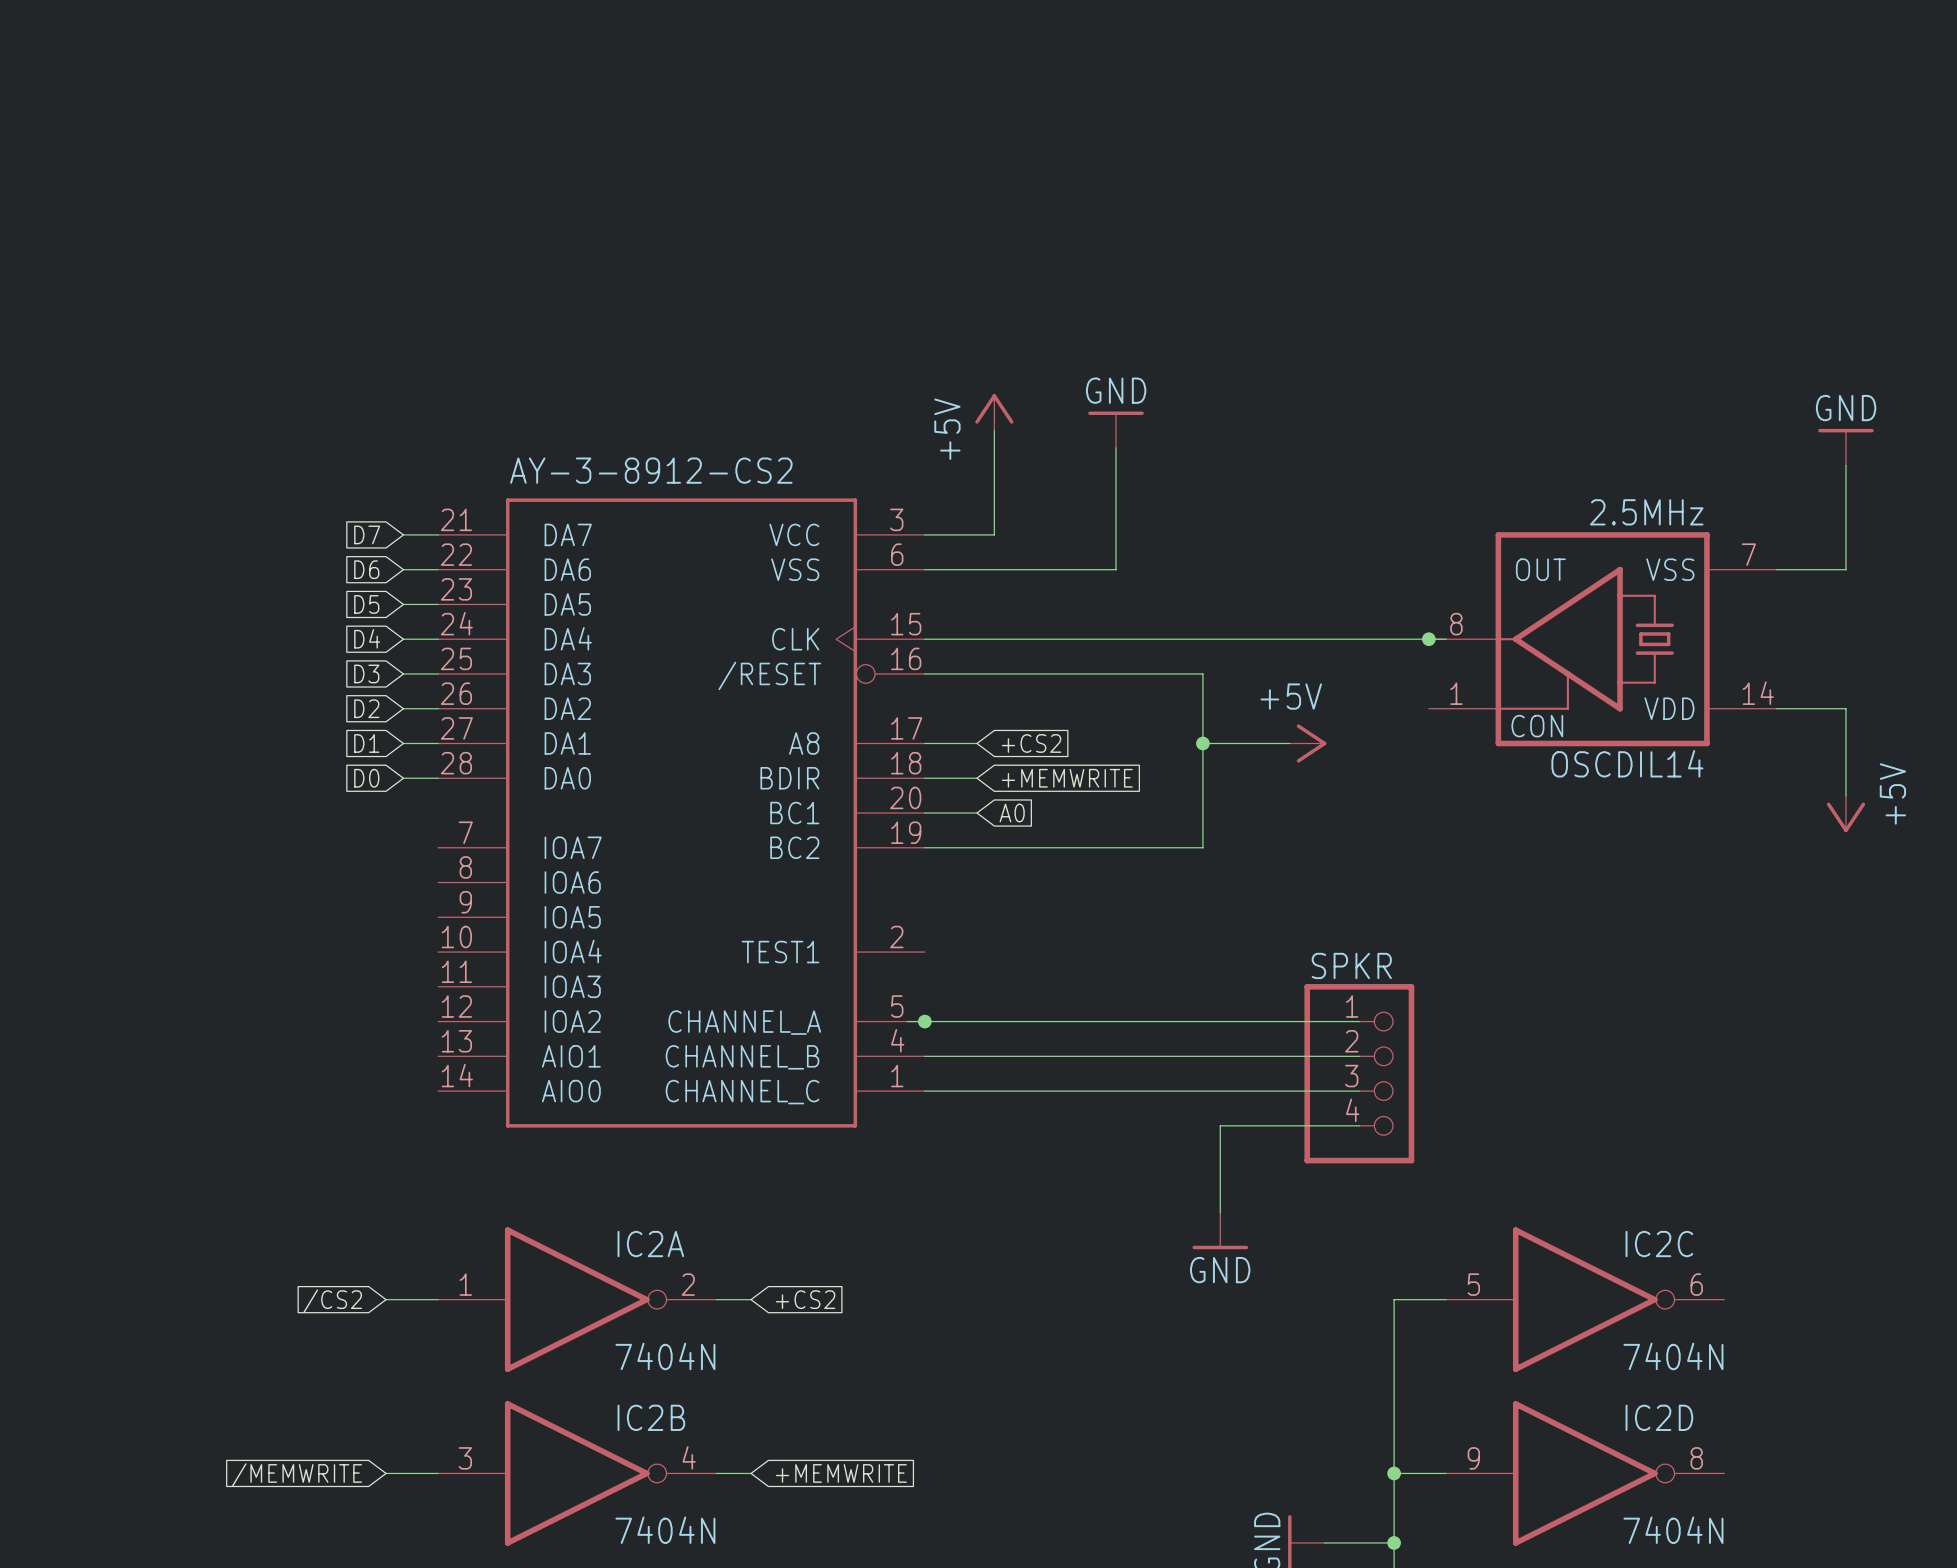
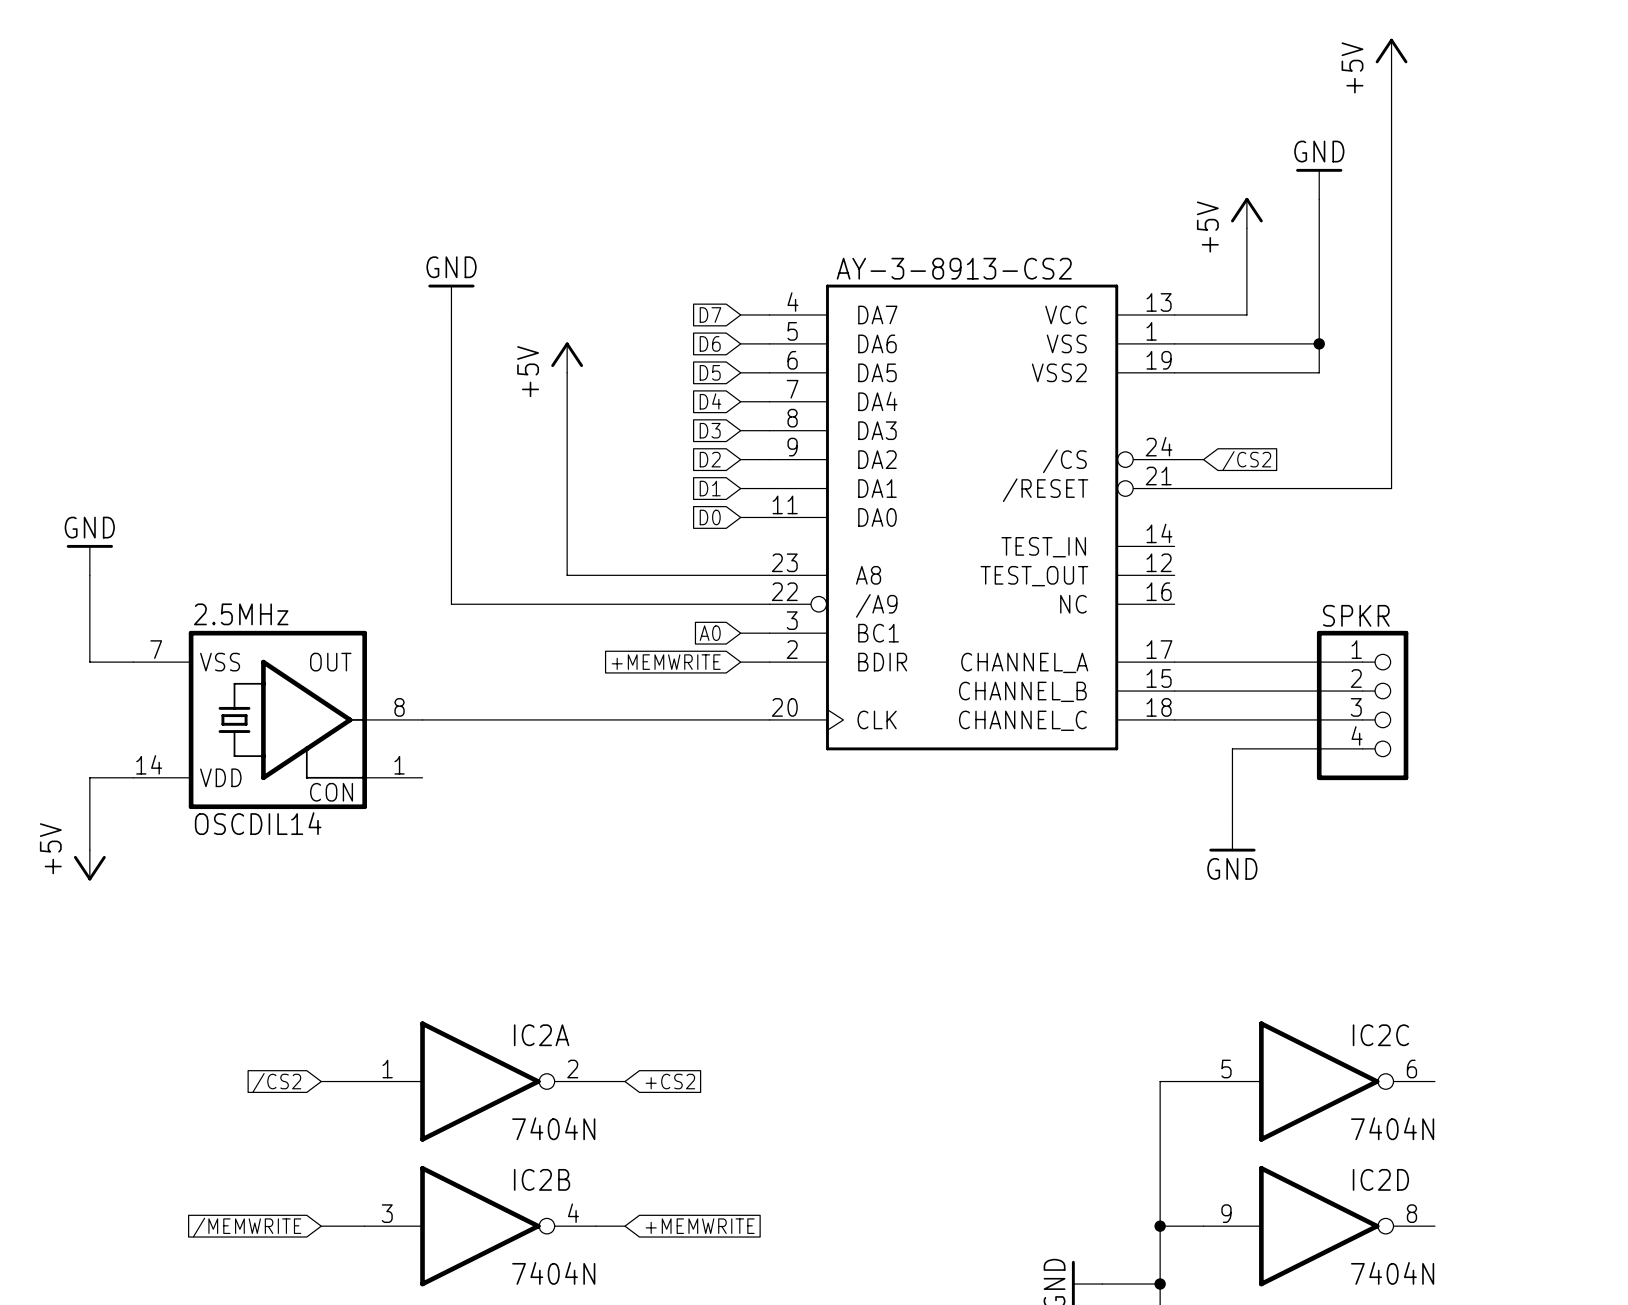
power symbol: none -> +5V (1391, 53)
wire: none -> (1391, 69) (1391, 488) (1174, 488)
power symbol: none -> GND (1319, 184)
wire: none -> (1319, 199) (1319, 372) (1174, 372)
power symbol: none -> +5V (1246, 213)
wire: none -> (1246, 228) (1246, 314) (1174, 314)
power symbol: none -> GND (451, 299)
wire: none -> (451, 314) (451, 604) (769, 604)
global label: none -> D7 (710, 314)
wire: none -> (740, 314) (769, 314)
power symbol: +5V (994, 412) -> none
global label: none -> D6 (710, 343)
wire: none -> (740, 343) (769, 343)
wire: none -> (1174, 343) (1319, 343)
junction: none -> (1319, 343)
power symbol: none -> +5V (567, 357)
power symbol: GND (1116, 429) -> none
wire: (994, 430) (994, 534) (924, 534) -> none
power symbol: GND (1845, 447) -> none
wire: none -> (567, 372) (567, 575) (769, 575)
global label: none -> D5 (710, 372)
wire: none -> (740, 372) (769, 372)
wire: (1116, 448) (1116, 569) (924, 569) -> none
wire: (1845, 465) (1845, 569) (1776, 569) -> none
global label: none -> D4 (710, 401)
wire: none -> (740, 401) (769, 401)
global label: none -> D3 (710, 430)
wire: none -> (740, 430) (769, 430)
global label: D7 (367, 534) -> none
wire: (403, 534) (438, 534) -> none
global label: none -> D2 (710, 459)
wire: none -> (740, 459) (769, 459)
wire: none -> (1174, 459) (1203, 459)
global label: none -> /CS2 (1246, 460)
global label: D6 (366, 569) -> none
wire: (403, 569) (438, 569) -> none
global label: none -> D1 (710, 488)
wire: none -> (740, 488) (769, 488)
global label: D5 (366, 604) -> none
wire: (403, 604) (438, 604) -> none
global label: none -> D0 (710, 517)
wire: none -> (740, 517) (769, 517)
AY-3-8913-CS2: none -> (972, 517)
global label: D4 (367, 638) -> none
wire: (403, 639) (438, 639) -> none
wire: (924, 639) (1446, 639) -> none
junction: (1428, 639) -> none
OSCDIL14 flip: as is (1602, 639) -> left-right (277, 719)
OSCDIL14 position: (1602, 639) -> (277, 719)
power symbol: none -> GND (89, 560)
global label: D3 (366, 673) -> none
wire: (403, 673) (438, 673) -> none
wire: (924, 673) (1202, 673) (1202, 847) (924, 847) -> none
wire: none -> (89, 575) (89, 662) (133, 662)
global label: D2 (366, 708) -> none
wire: (403, 708) (438, 708) -> none
wire: (1776, 708) (1845, 708) (1845, 795) -> none
global label: D1 (366, 743) -> none
wire: (403, 743) (438, 743) -> none
wire: (924, 743) (976, 743) -> none
global label: +CS2 (1031, 743) -> none
wire: (1202, 743) (1289, 743) -> none
junction: (1202, 743) -> none
power symbol: +5V (1308, 743) -> none
wire: none -> (740, 633) (769, 633)
global label: D0 (366, 778) -> none
wire: (403, 778) (438, 778) -> none
wire: (924, 778) (976, 778) -> none
global label rotation: 0° (1067, 778) -> 180° (666, 662)
global label position: +MEMWRITE (1067, 778) -> +MEMWRITE (666, 662)
wire: none -> (740, 662) (769, 662)
wire: none -> (1174, 662) (1362, 662)
AY-3-8912-CS2: (681, 813) -> none
wire: (924, 813) (976, 813) -> none
global label rotation: 0° (1012, 813) -> 180° (710, 633)
global label position: A0 (1012, 813) -> A0 (710, 633)
power symbol: +5V (1845, 813) -> none
wire: none -> (1174, 691) (1362, 691)
SPKR: none -> (1362, 705)
wire: none -> (422, 719) (769, 719)
wire: none -> (1174, 719) (1362, 719)
wire: none -> (1362, 748) (1232, 748) (1232, 821)
wire: none -> (133, 777) (89, 777) (89, 850)
power symbol: none -> GND (1232, 836)
wire: (907, 1021) (1359, 1021) -> none
junction: (924, 1021) -> none
power symbol: none -> +5V (89, 865)
wire: (924, 1056) (1359, 1056) -> none
SPKR: (1359, 1073) -> none
wire: (924, 1091) (1359, 1091) -> none
wire: (1359, 1125) (1220, 1125) (1220, 1212) -> none
power symbol: GND (1220, 1231) -> none

